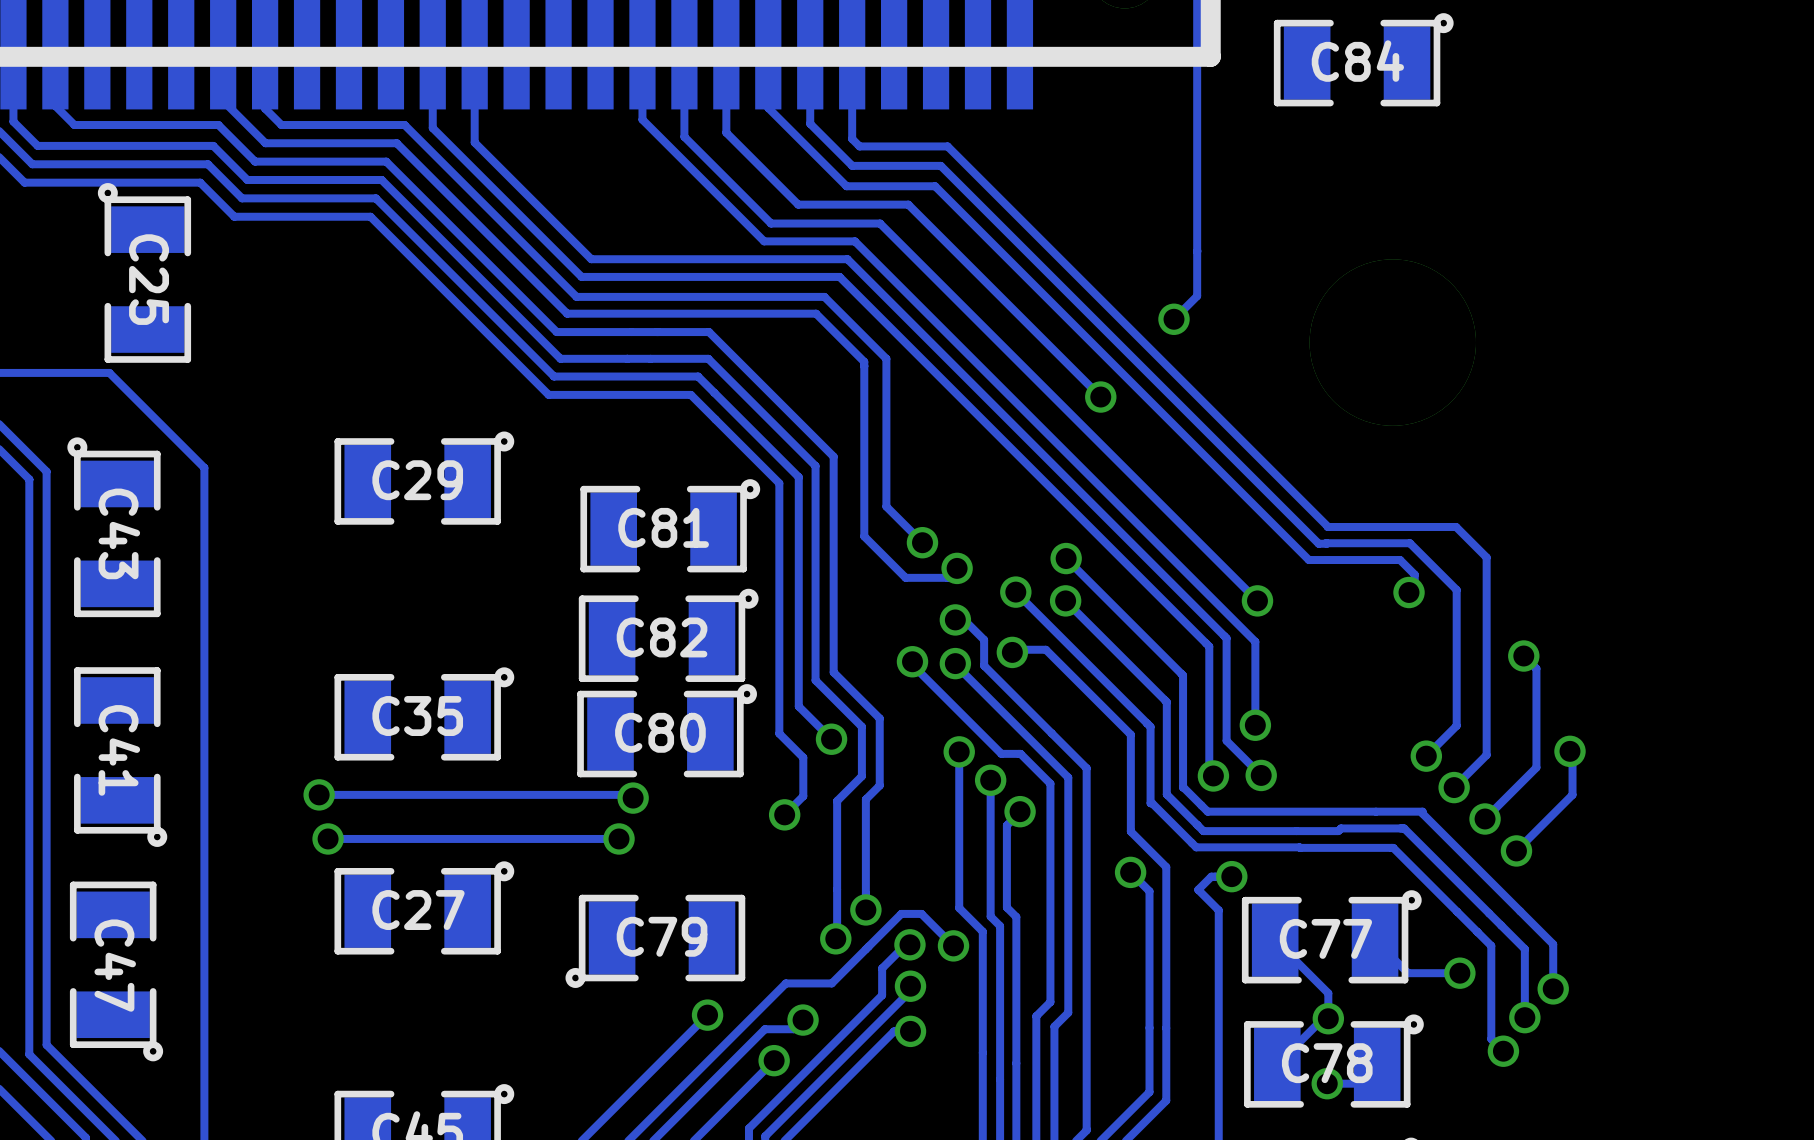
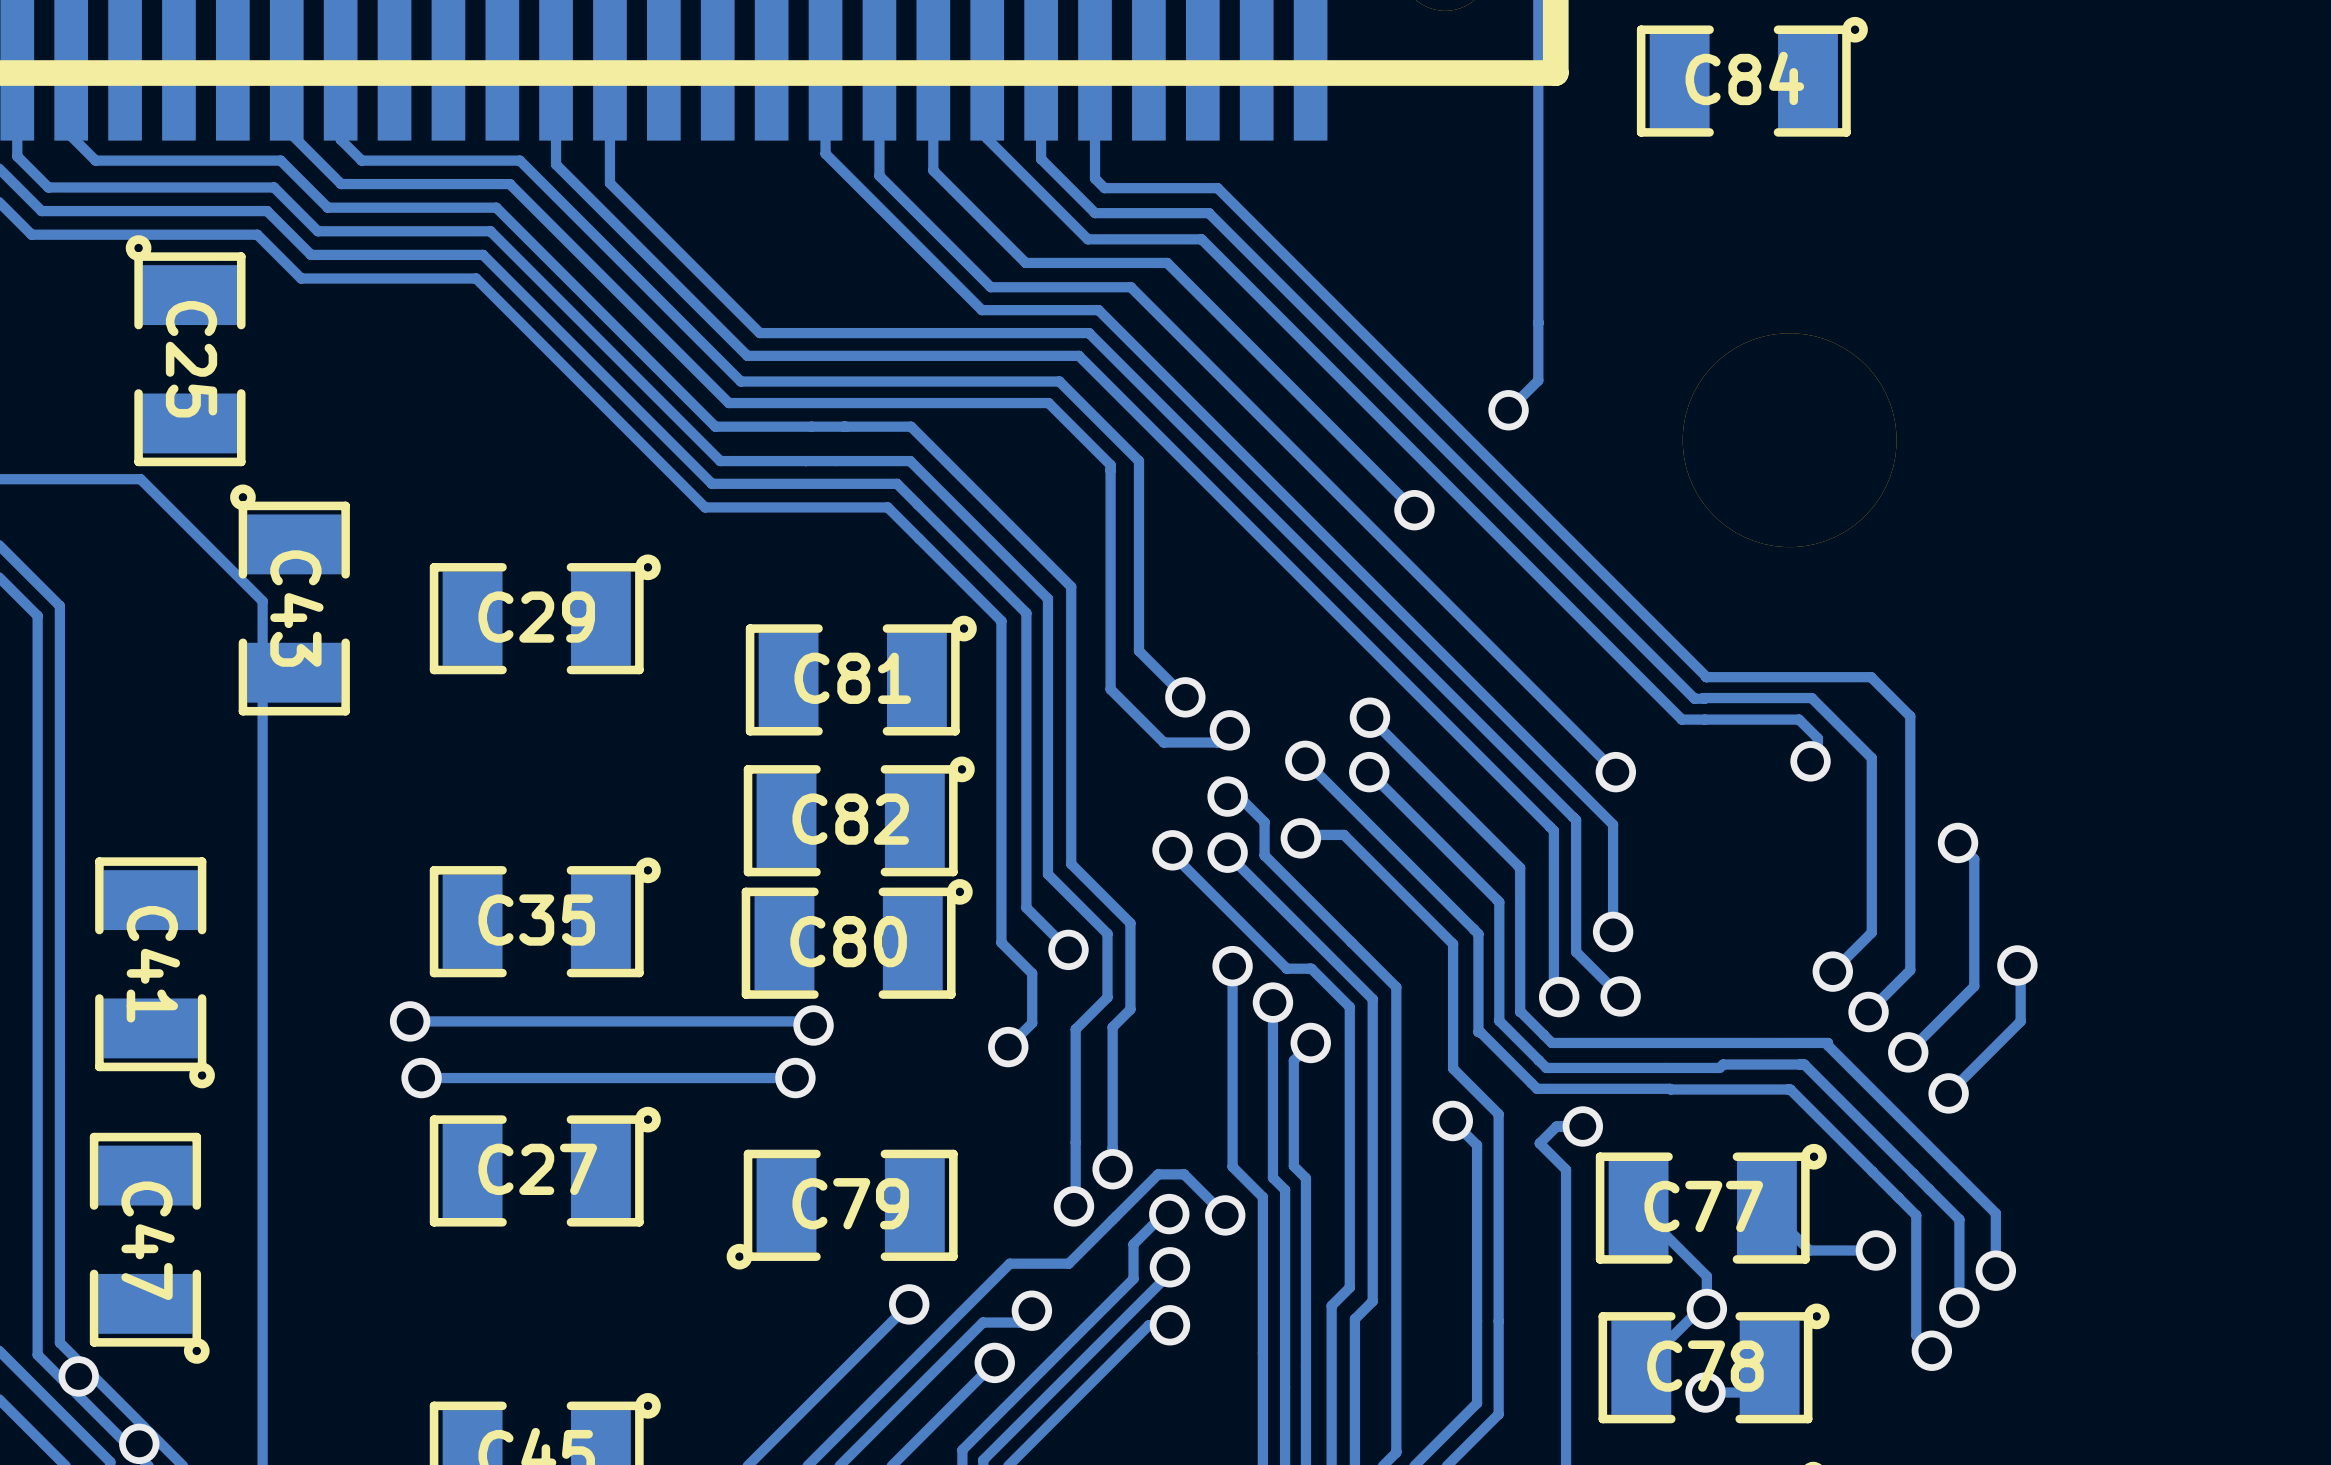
C43 position: (113, 527) -> (290, 600)
via: none -> (78, 1376)
via: none -> (139, 1443)

